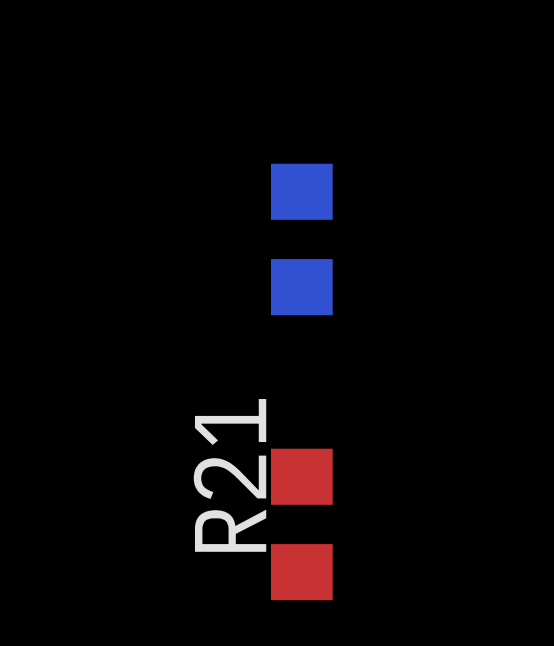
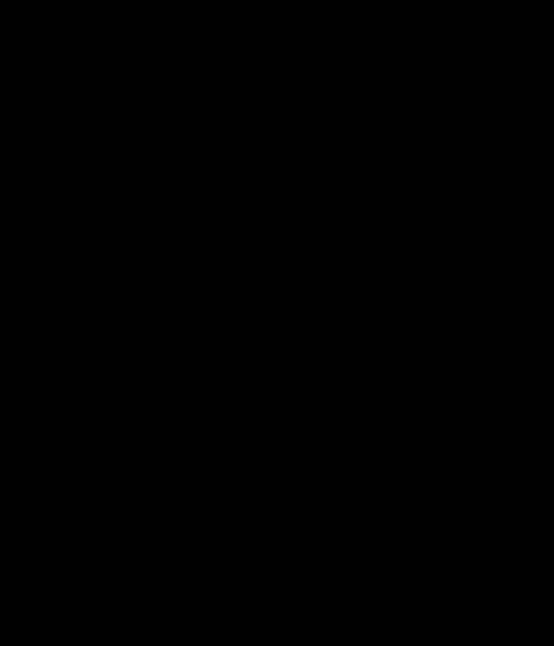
part: (301, 239) -> none
R21: (301, 524) -> none

